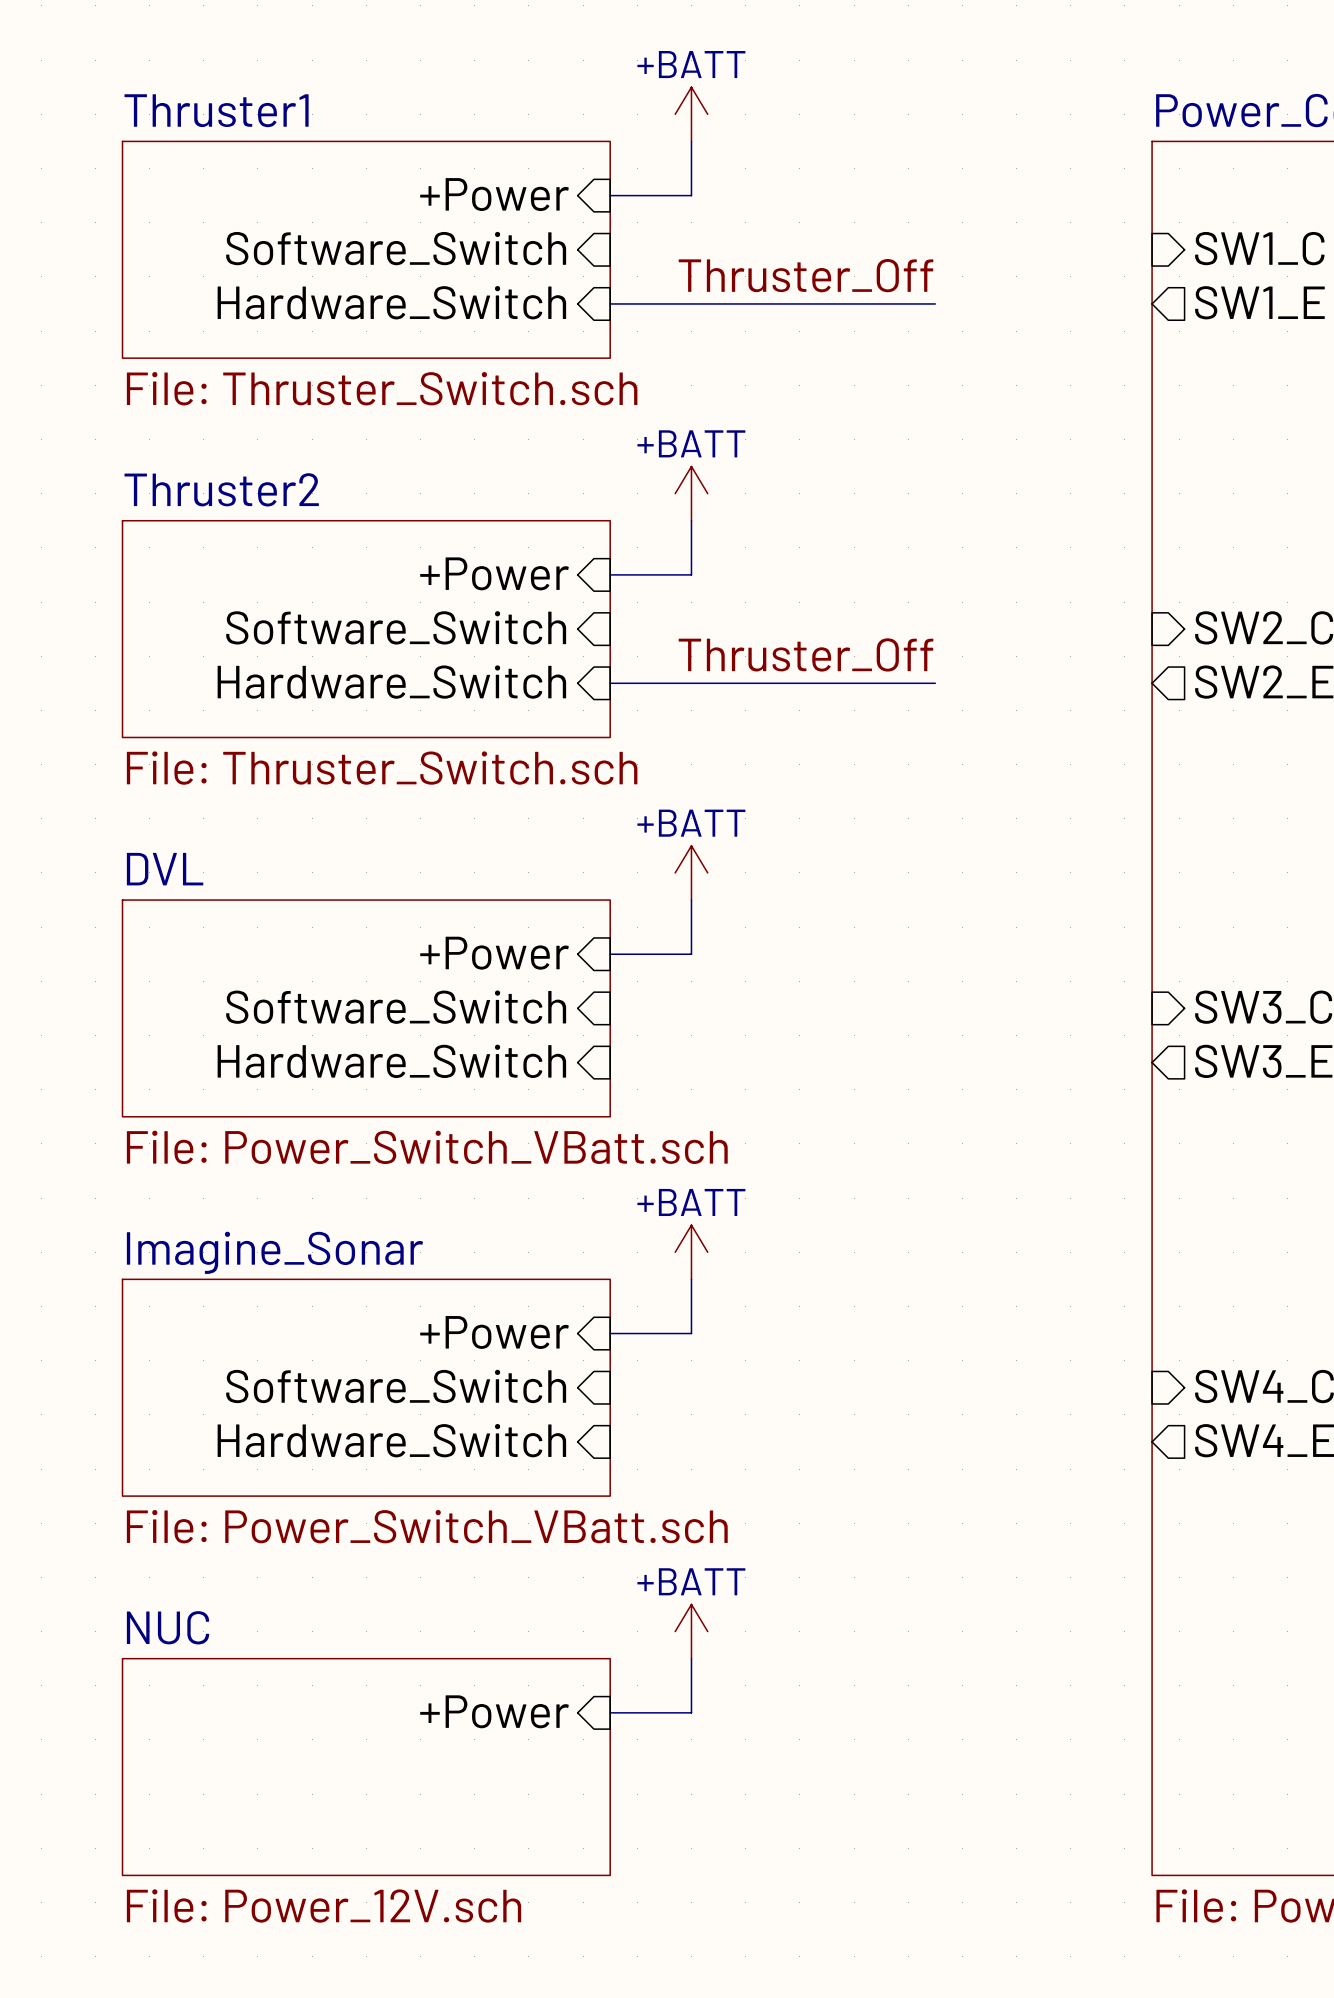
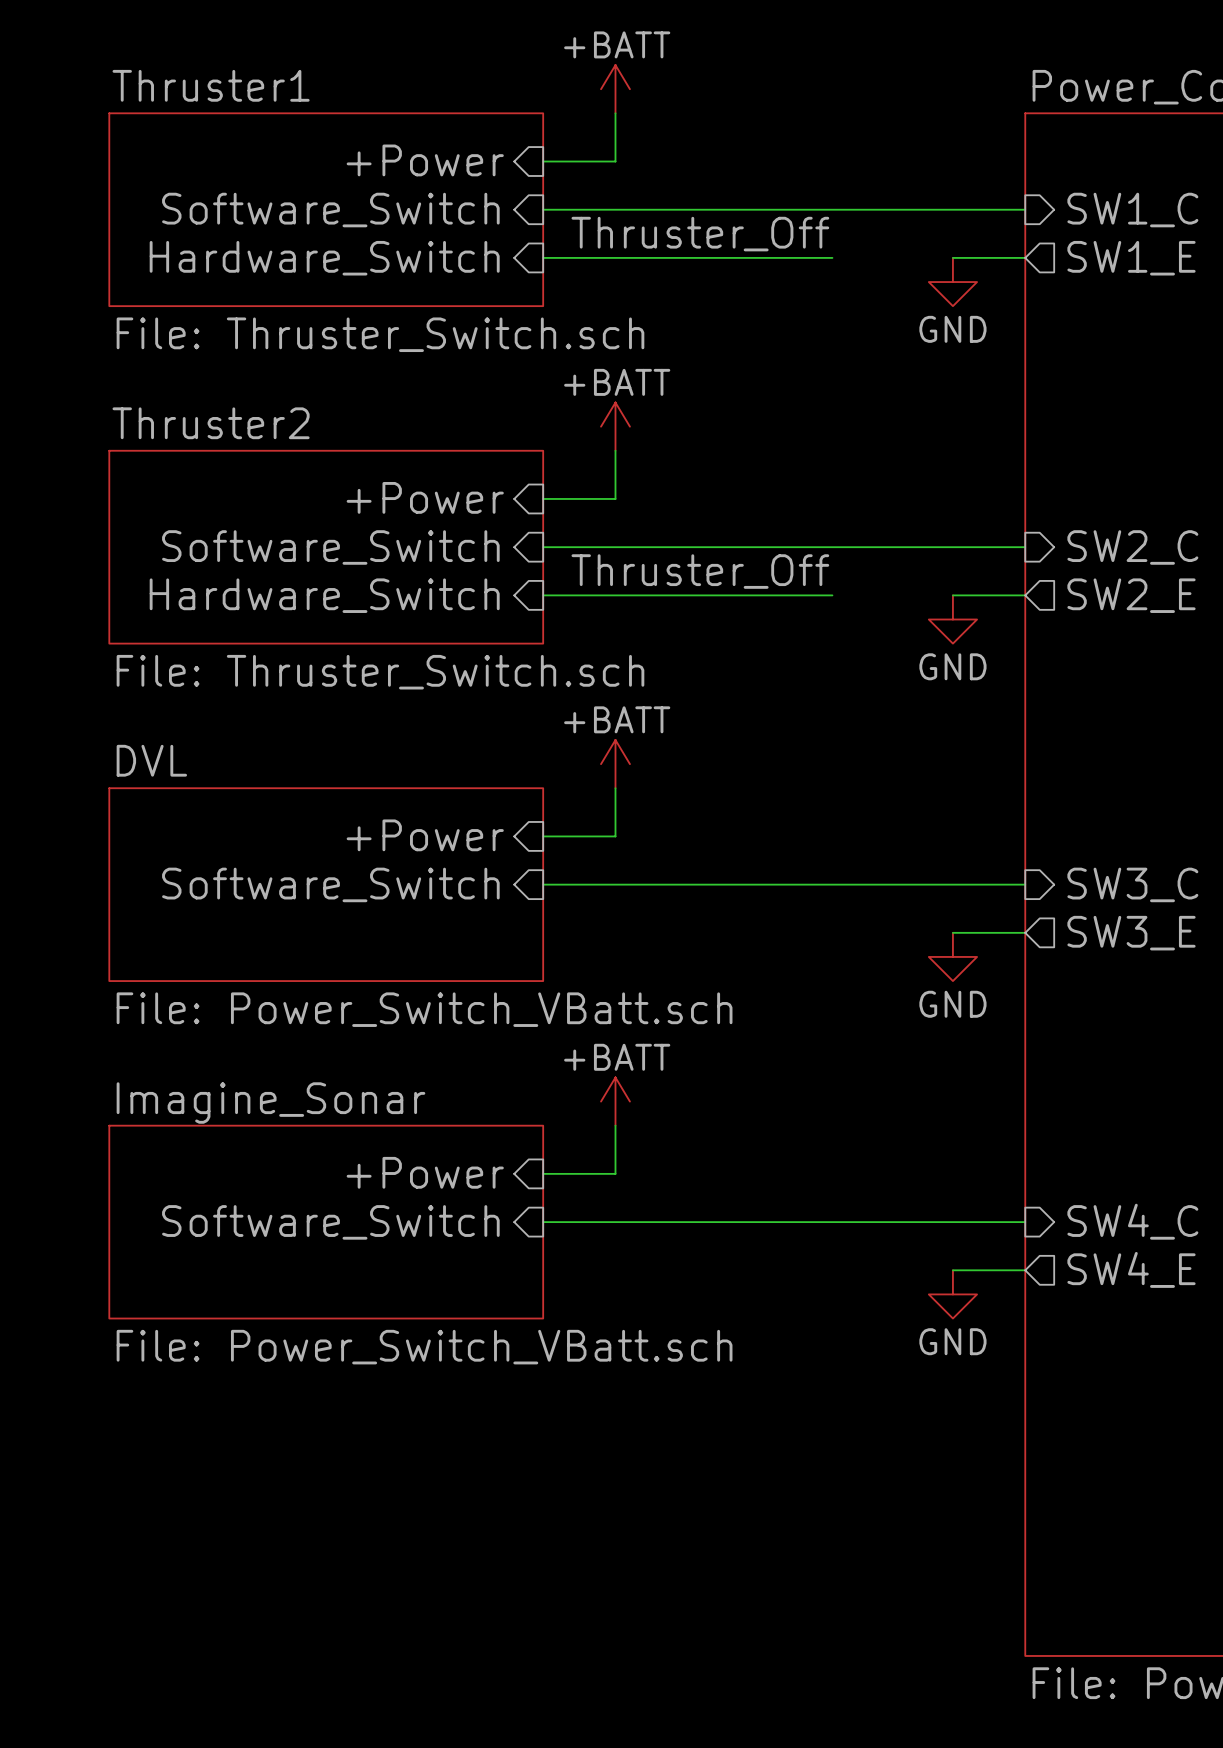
wire: none -> (543, 209) (1025, 209)
wire: none -> (952, 257) (1025, 257)
power symbol: none -> GND (952, 282)
wire: none -> (543, 547) (1025, 547)
wire: none -> (952, 595) (1025, 595)
power symbol: none -> GND (952, 619)
wire: none -> (543, 884) (1025, 884)
sheet pin: Hardware_Switch (391, 1061) -> none
wire: none -> (952, 932) (1025, 932)
power symbol: none -> GND (952, 956)
wire: none -> (543, 1222) (1025, 1222)
sheet pin: Hardware_Switch (391, 1440) -> none
wire: none -> (952, 1270) (1025, 1270)
power symbol: none -> GND (952, 1294)
power symbol: +BATT (691, 1631) -> none
wire: (691, 1658) (691, 1712) (610, 1712) -> none
sheet pin: +Power (494, 1711) -> none
sheet NUC: File: Power_12V.sch (366, 1767) -> none

